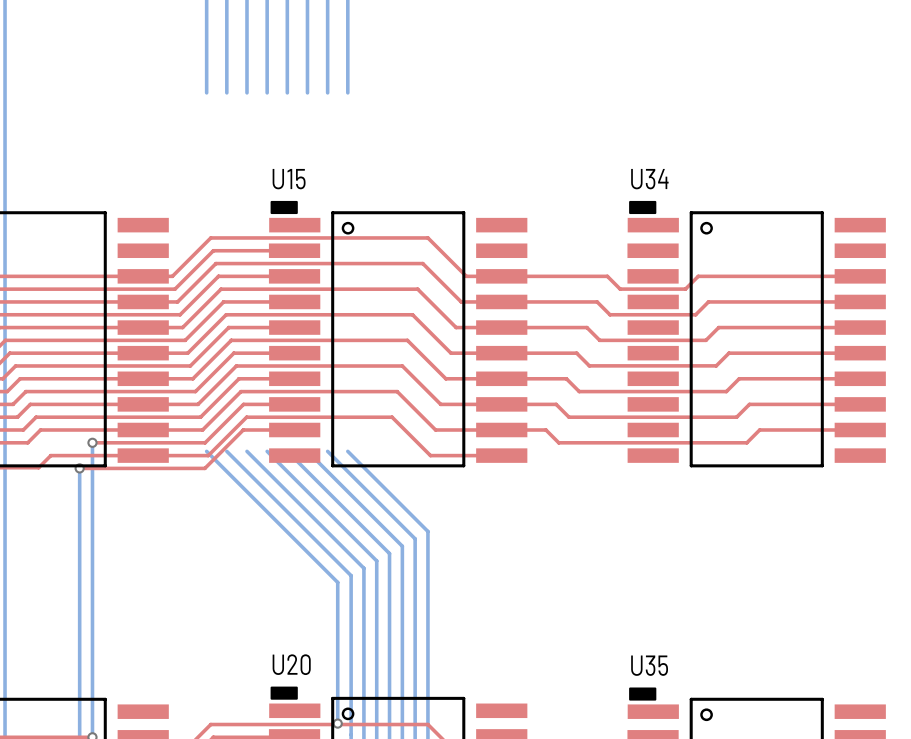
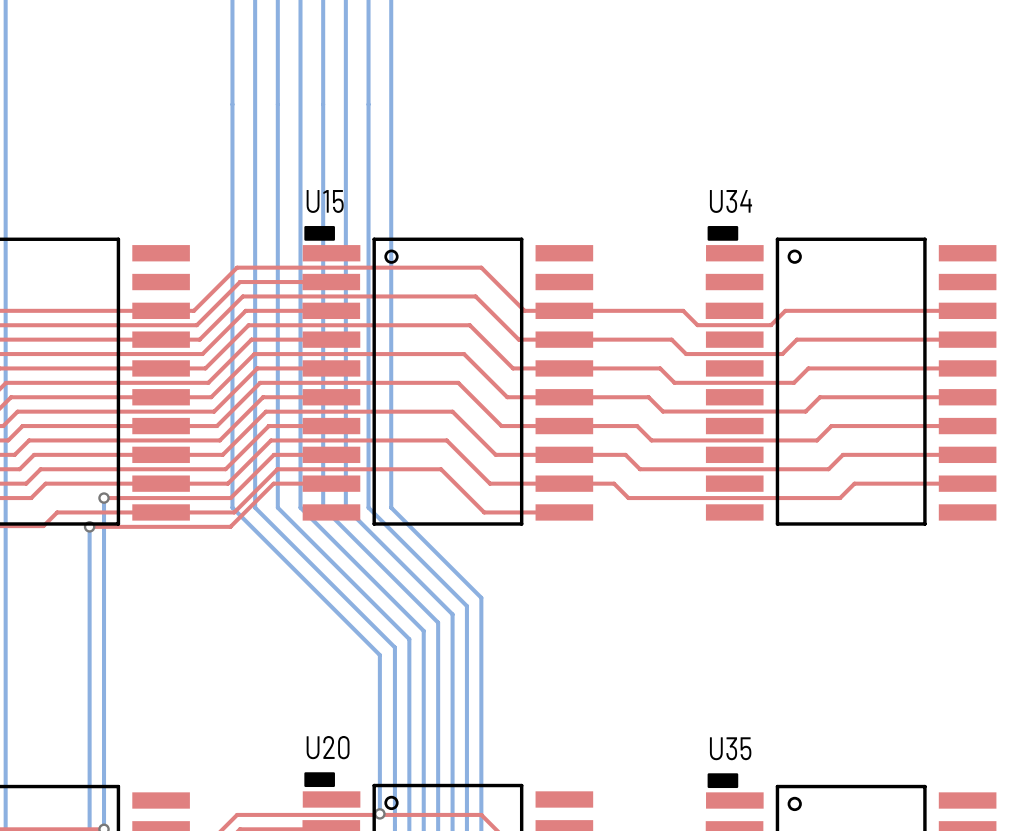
bottom track: none -> (232, 104) (232, 507)
bottom track: none -> (255, 104) (255, 507)
bottom track: none -> (277, 104) (277, 507)
bottom track: none -> (300, 104) (300, 507)
bottom track: none -> (323, 104) (323, 507)
bottom track: none -> (345, 104) (345, 507)
bottom track: none -> (368, 104) (368, 507)
bottom track: none -> (391, 104) (391, 507)

